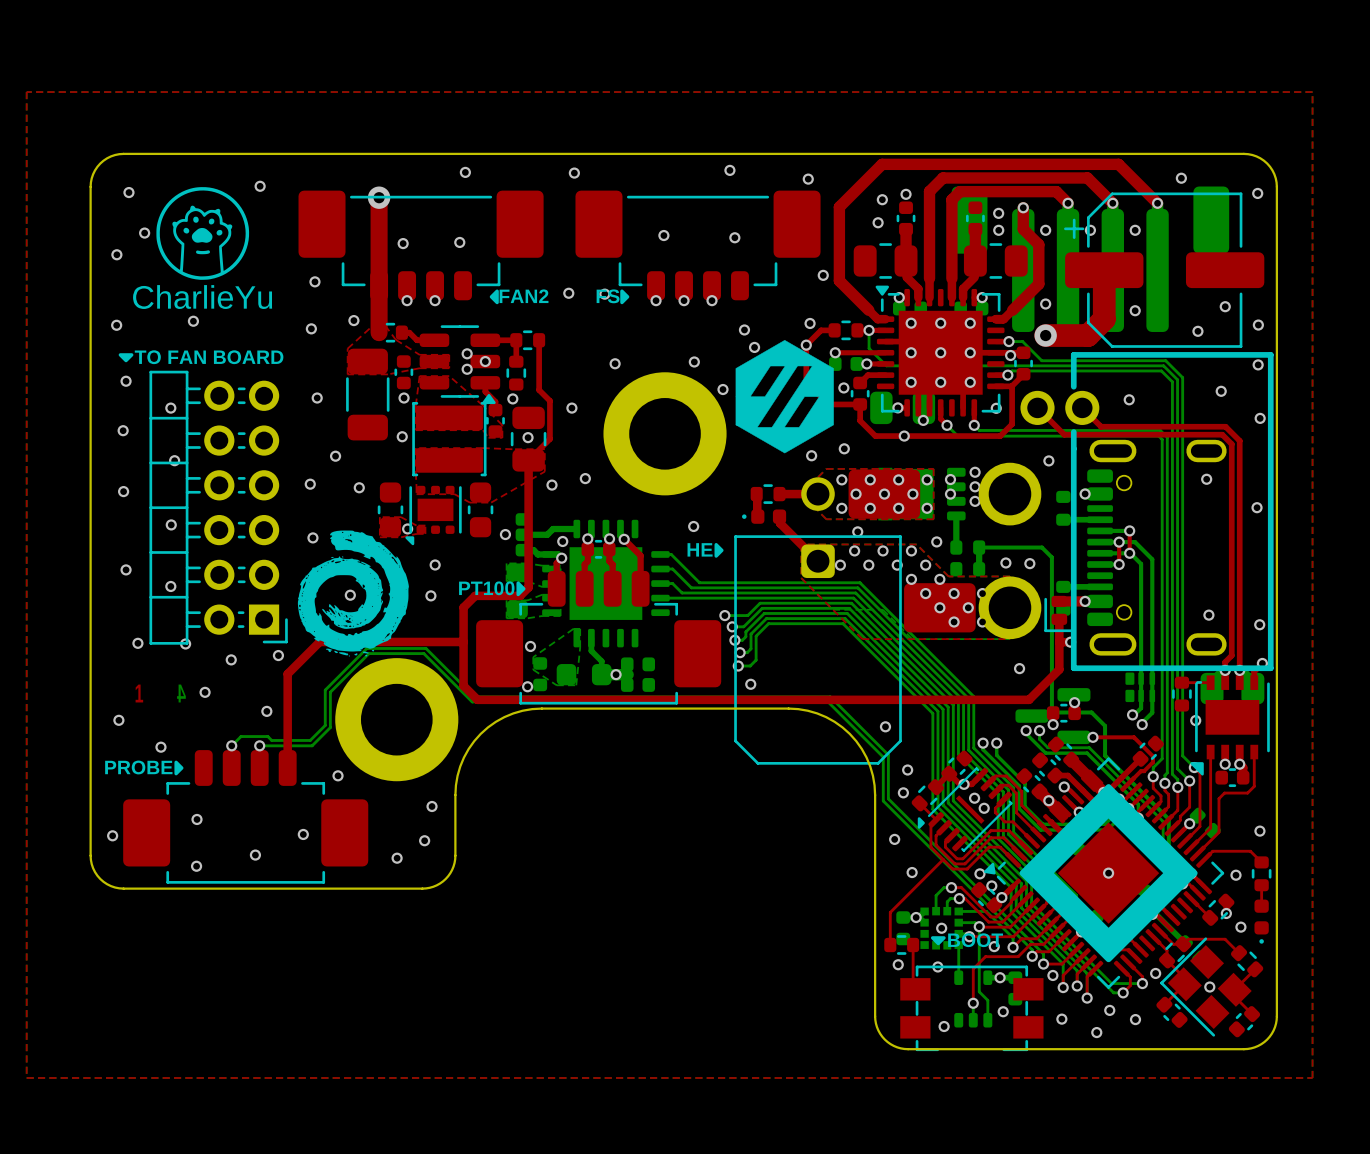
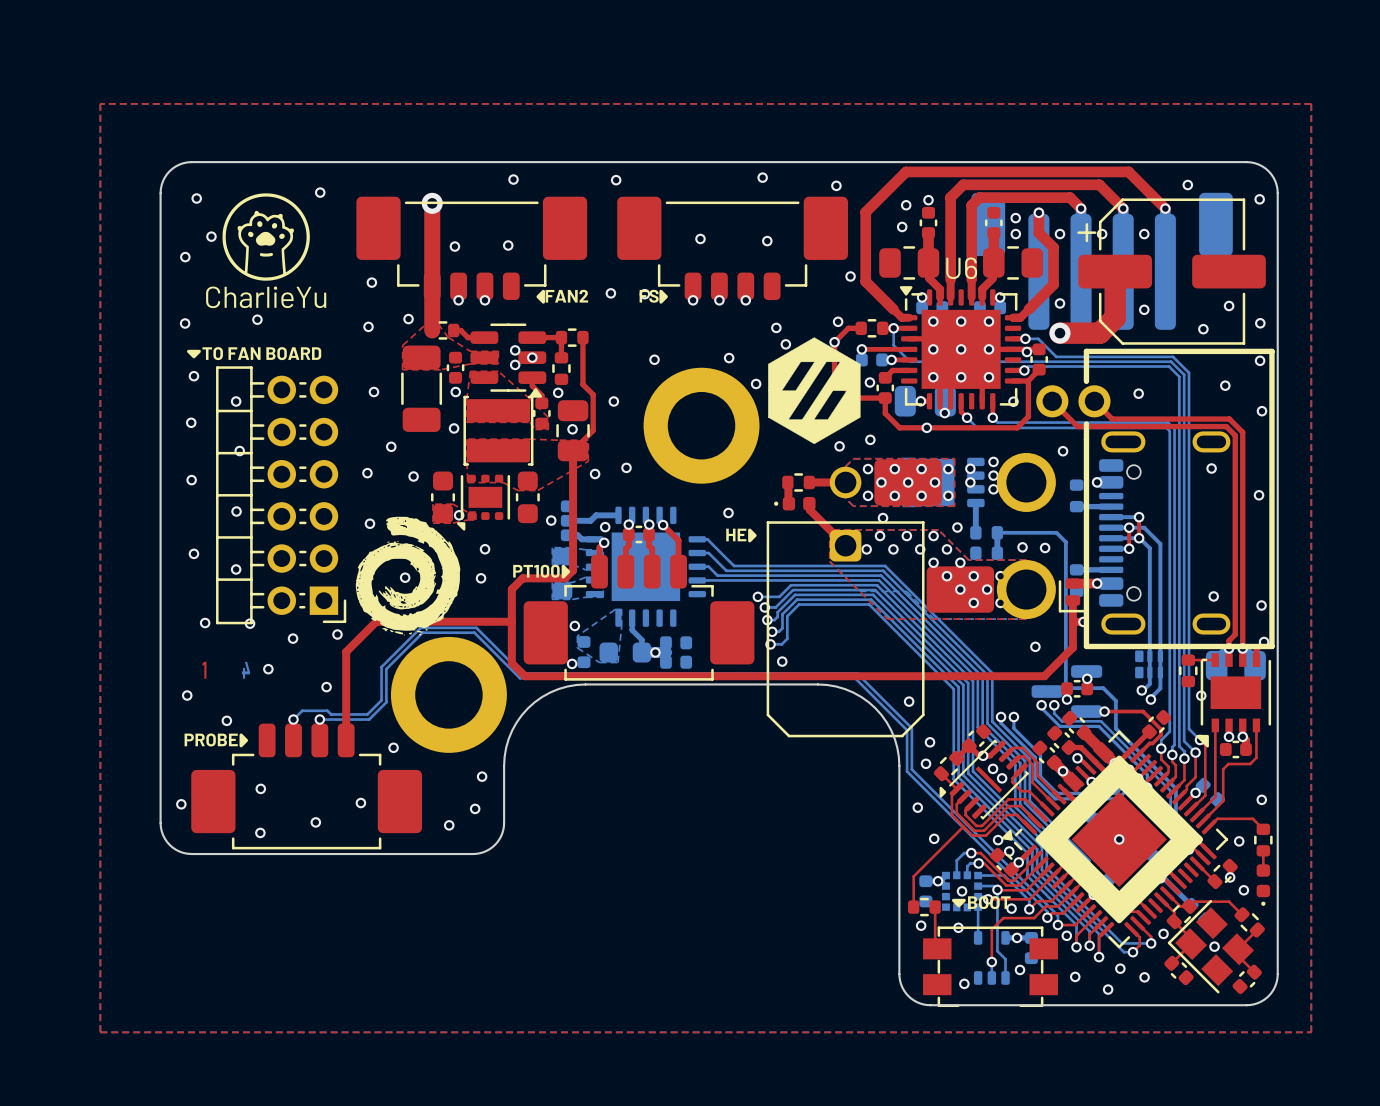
U6 name: none -> U6 (961, 268)

